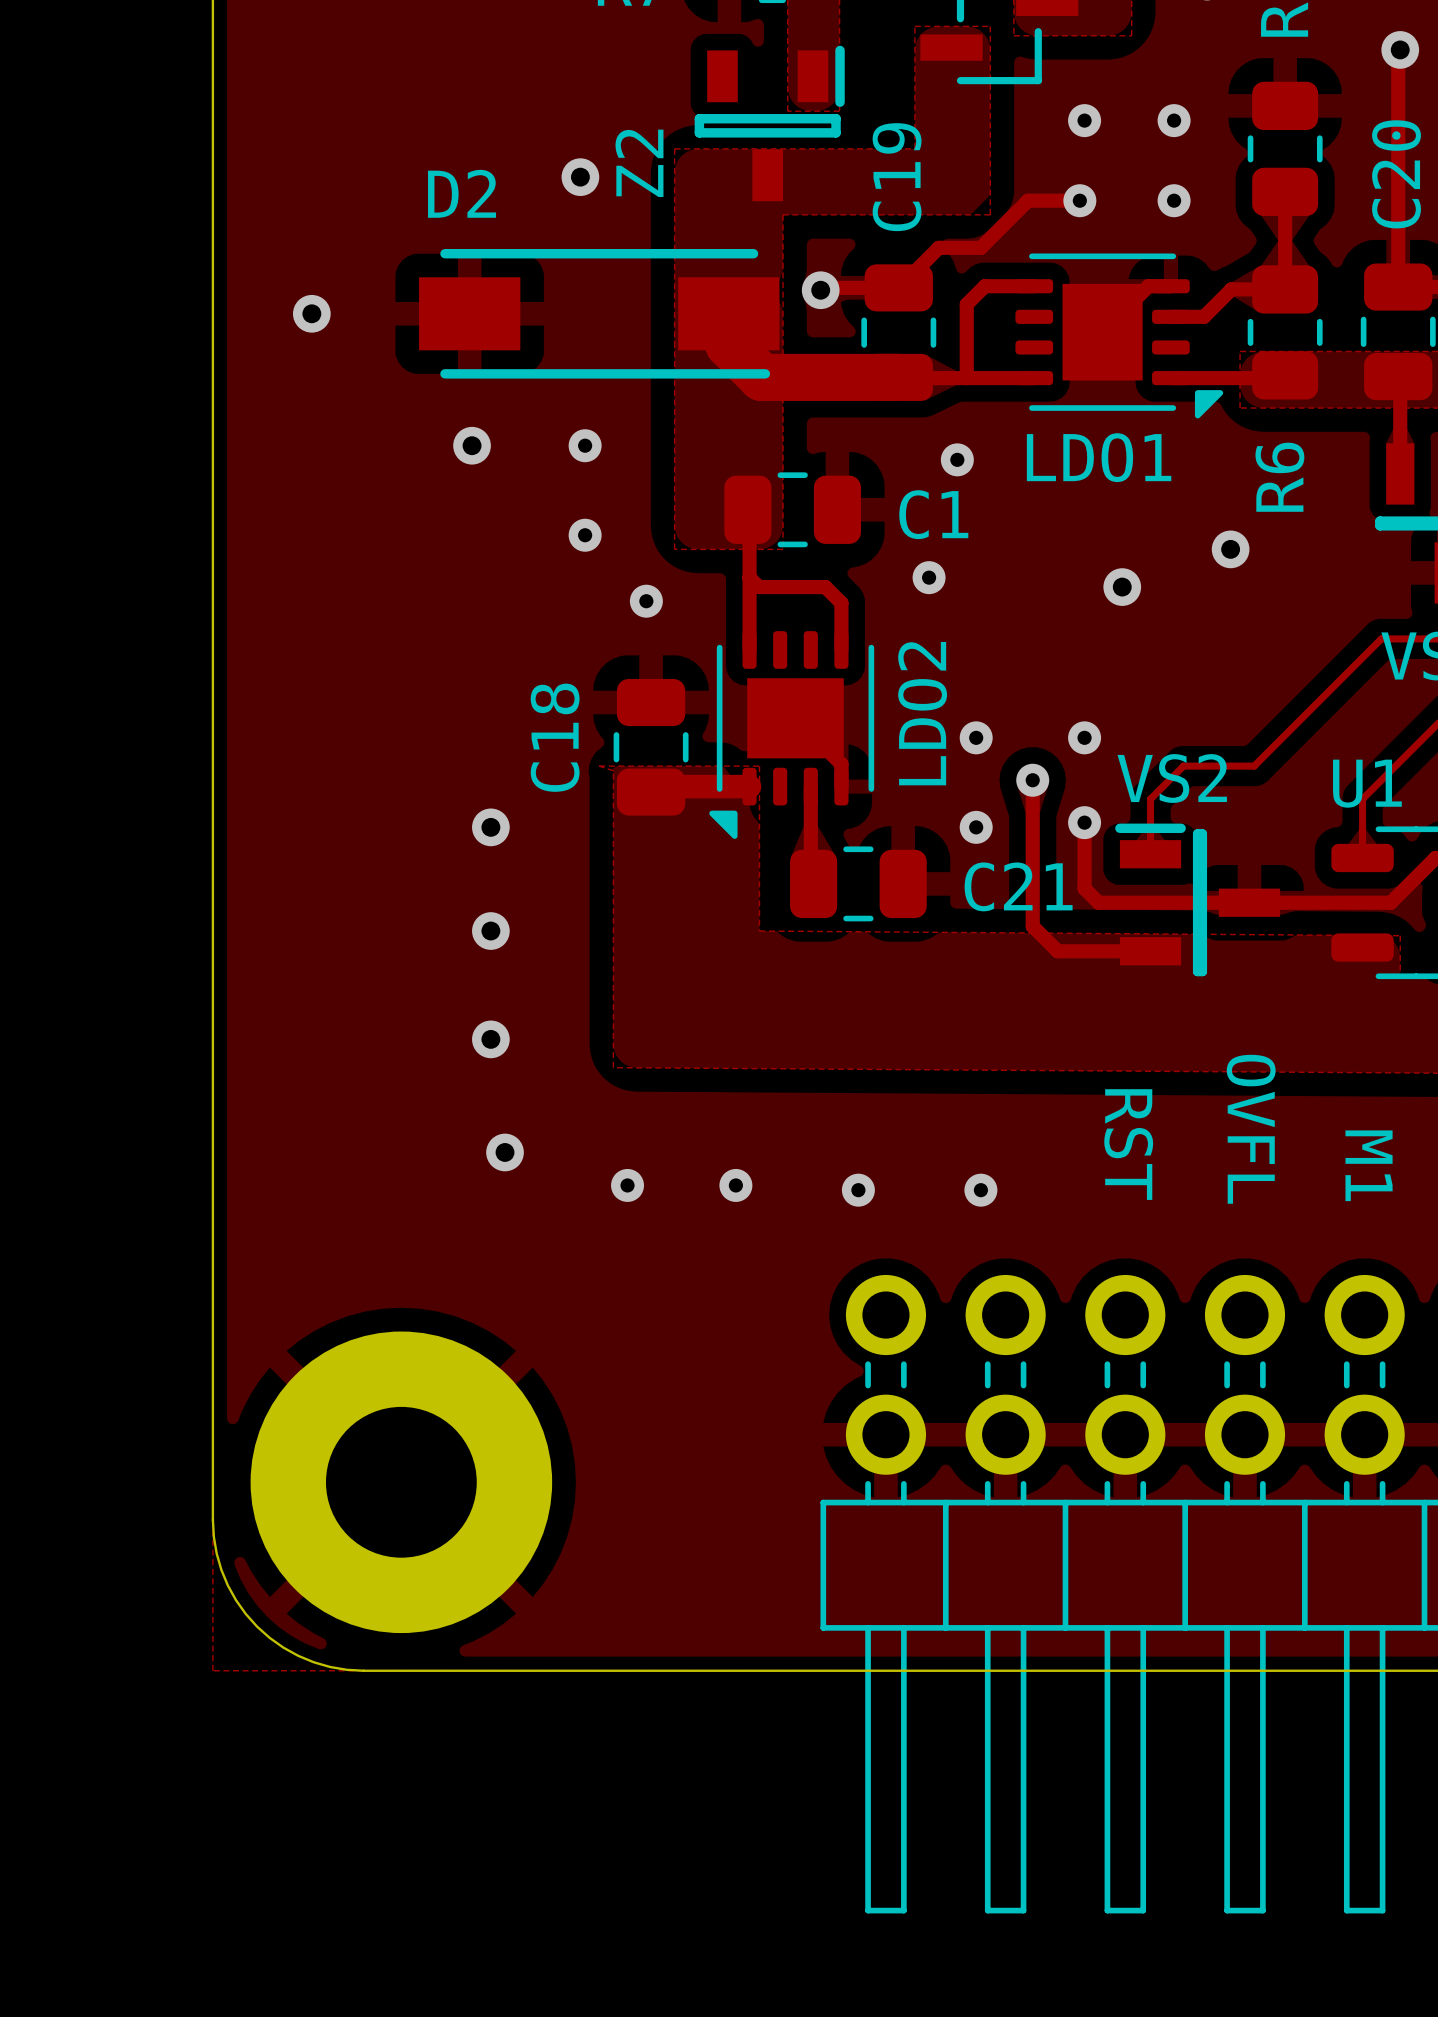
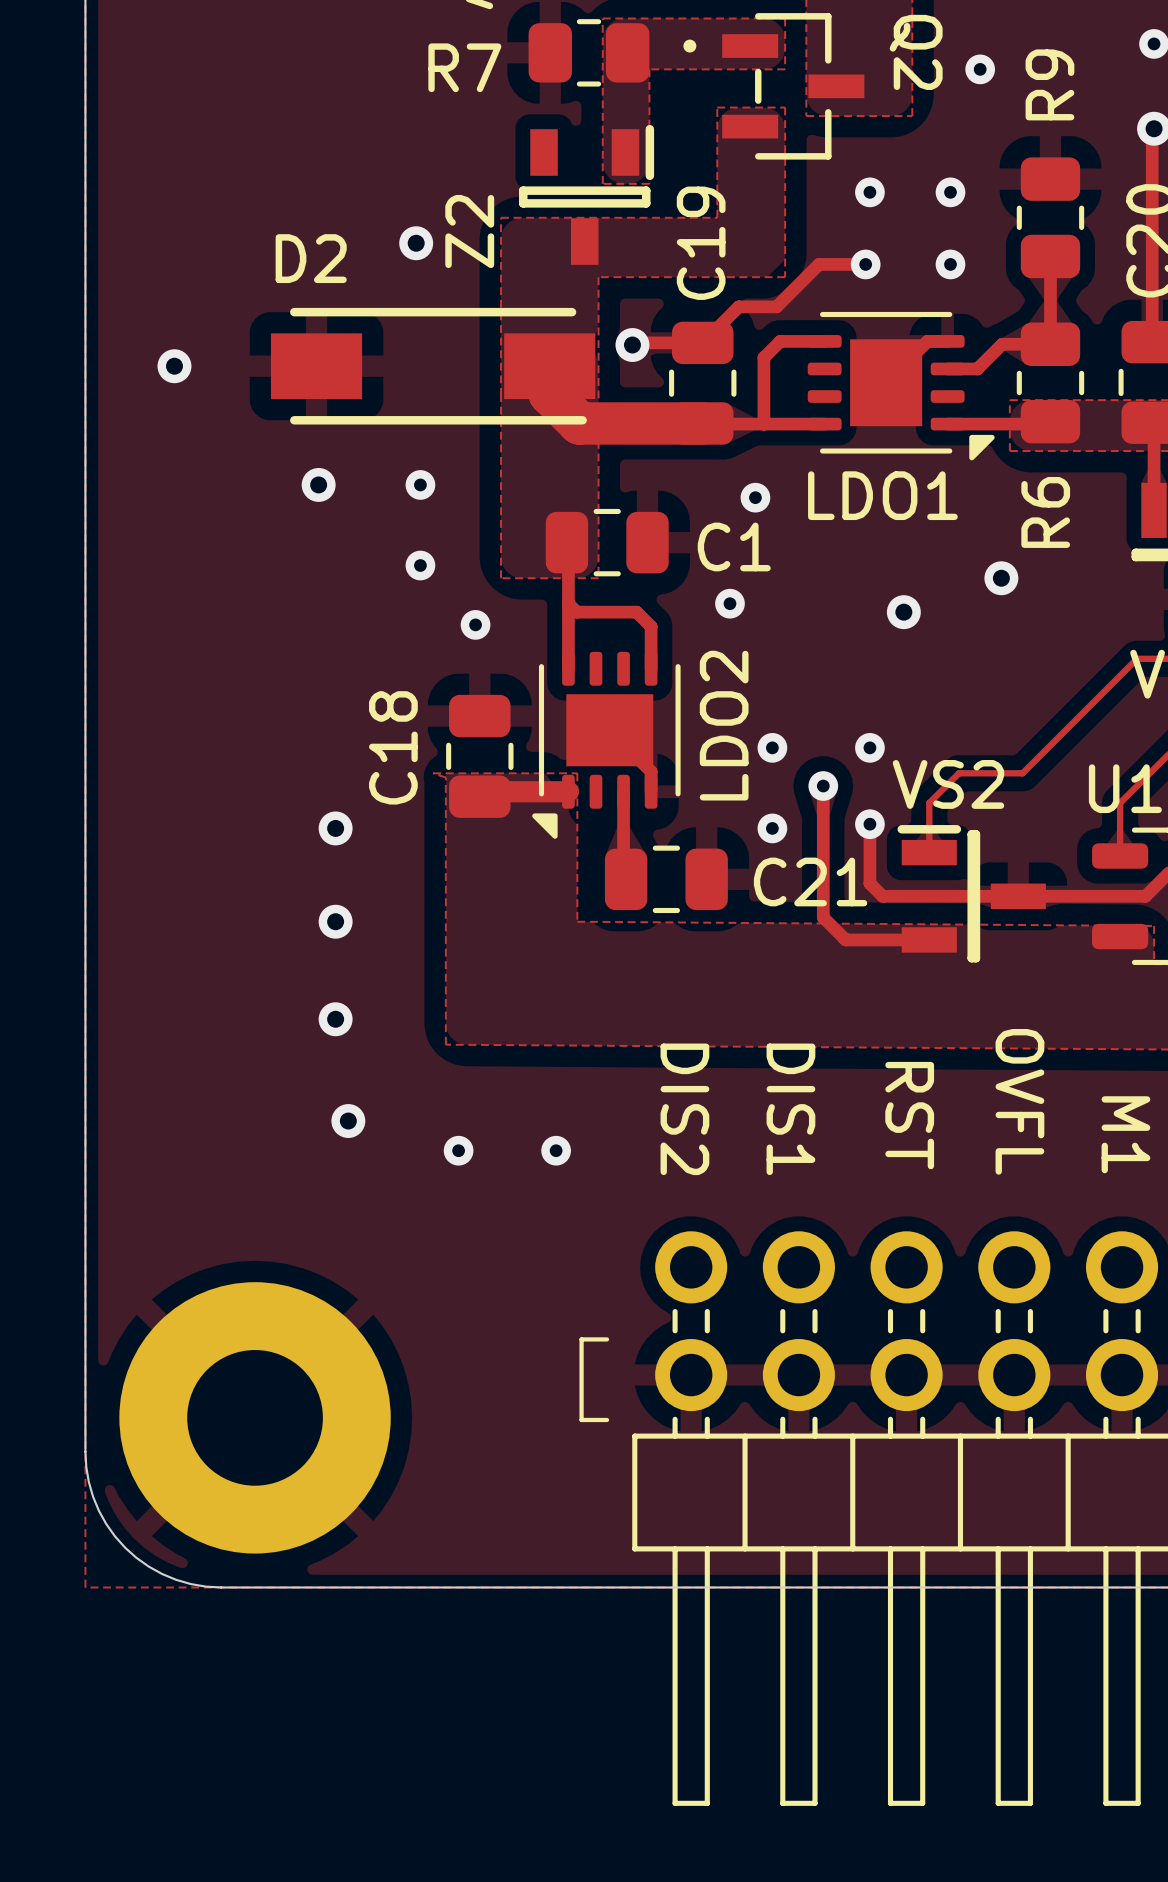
text: none -> DIS2 (684, 1109)
text: none -> DIS1 (790, 1109)
via: (858, 1190) -> none
via: (980, 1190) -> none
line: none -> (607, 1339) (581, 1339) (581, 1419) (607, 1419)

